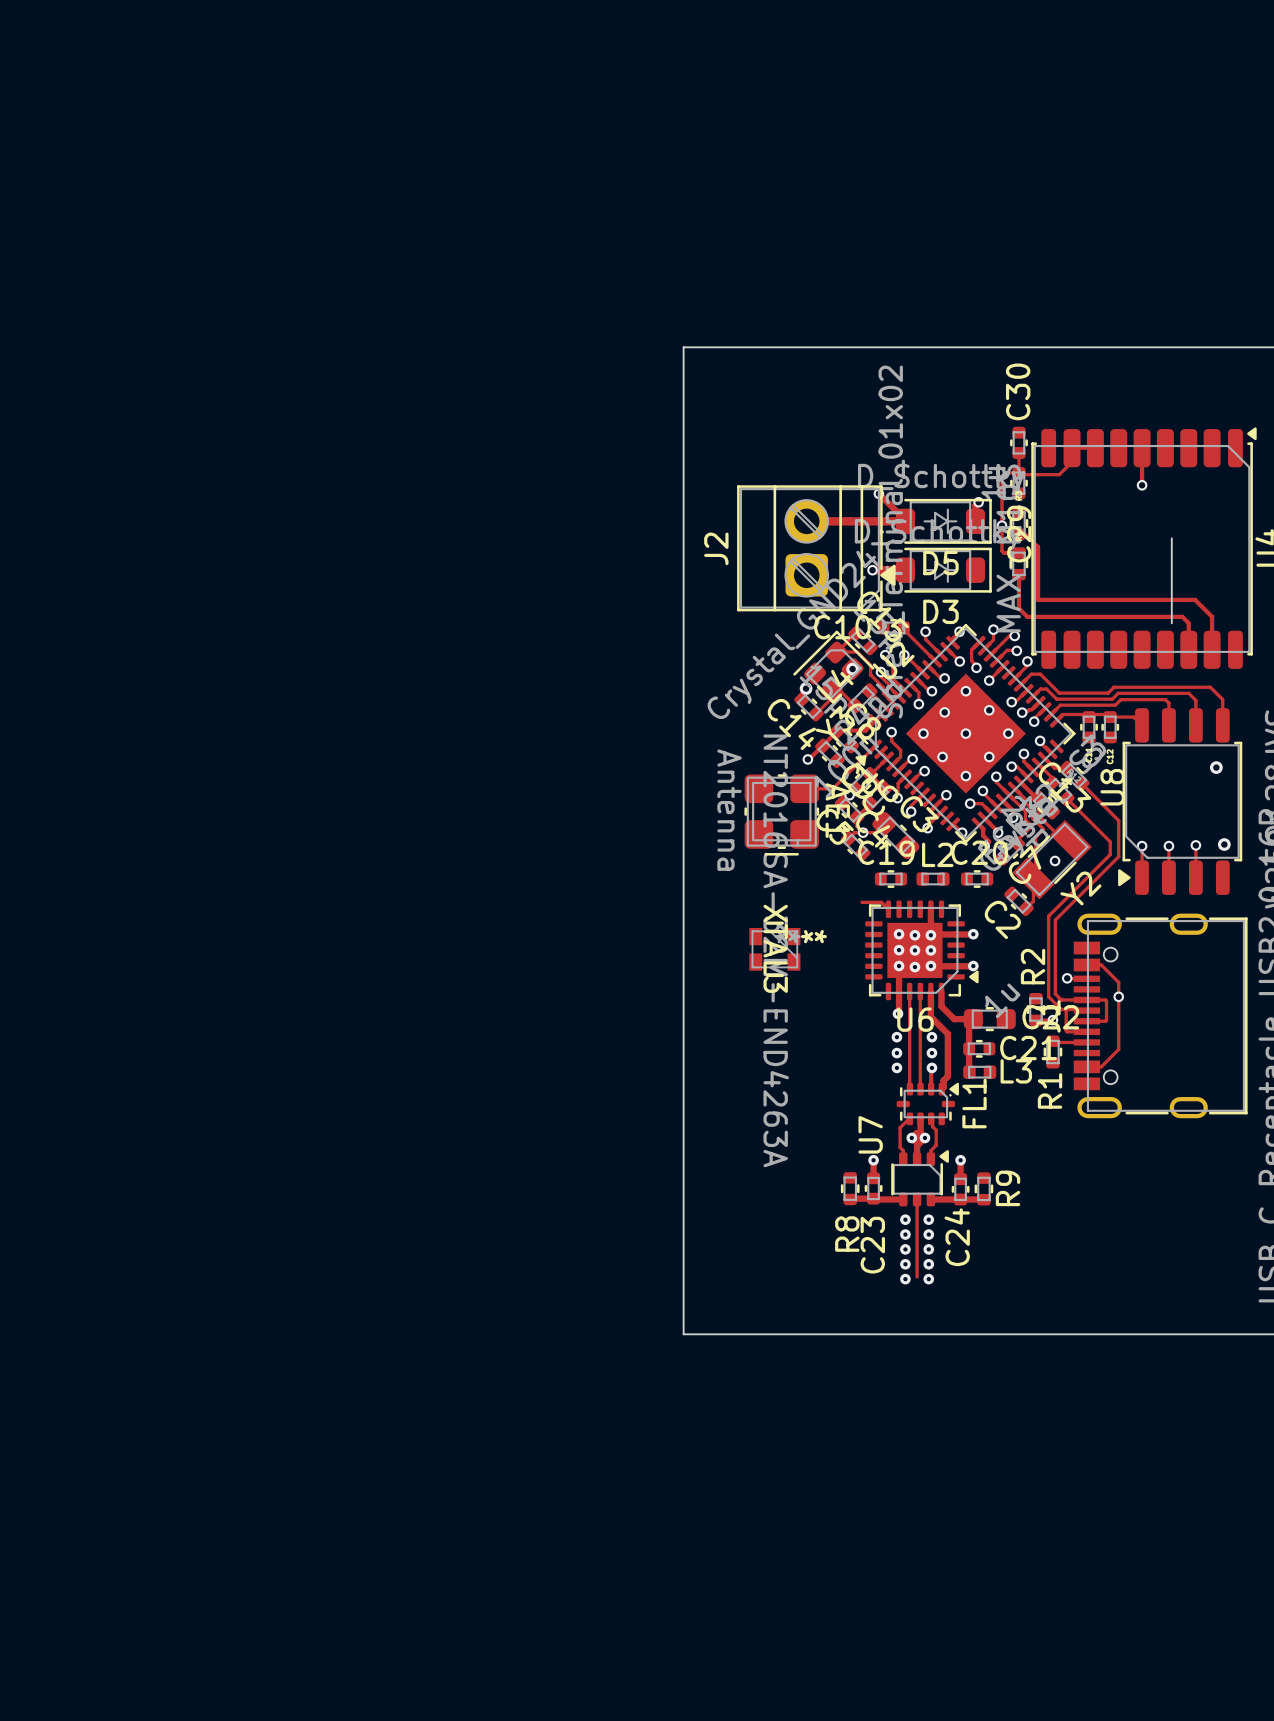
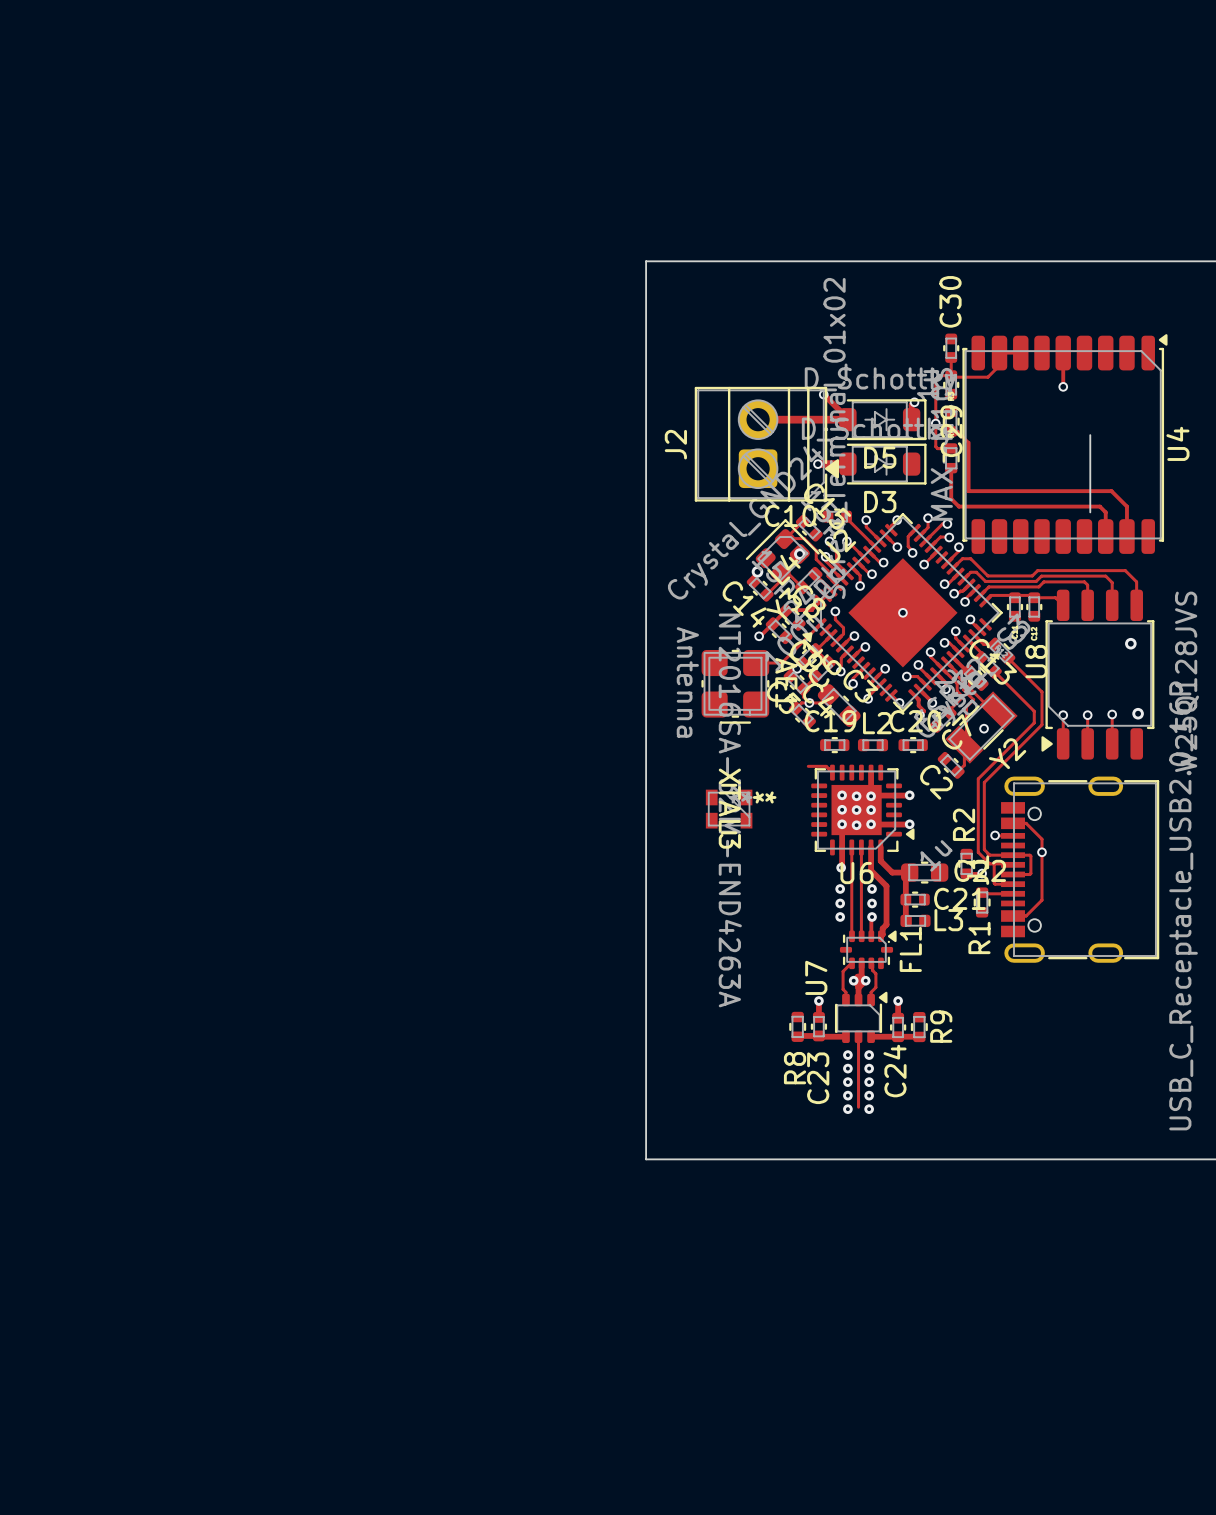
via: (965, 691) -> none
via: (989, 710) -> none
via: (944, 712) -> none
via: (923, 733) -> none
via: (1008, 733) -> none
via: (942, 756) -> none
via: (989, 756) -> none
via: (965, 776) -> none

